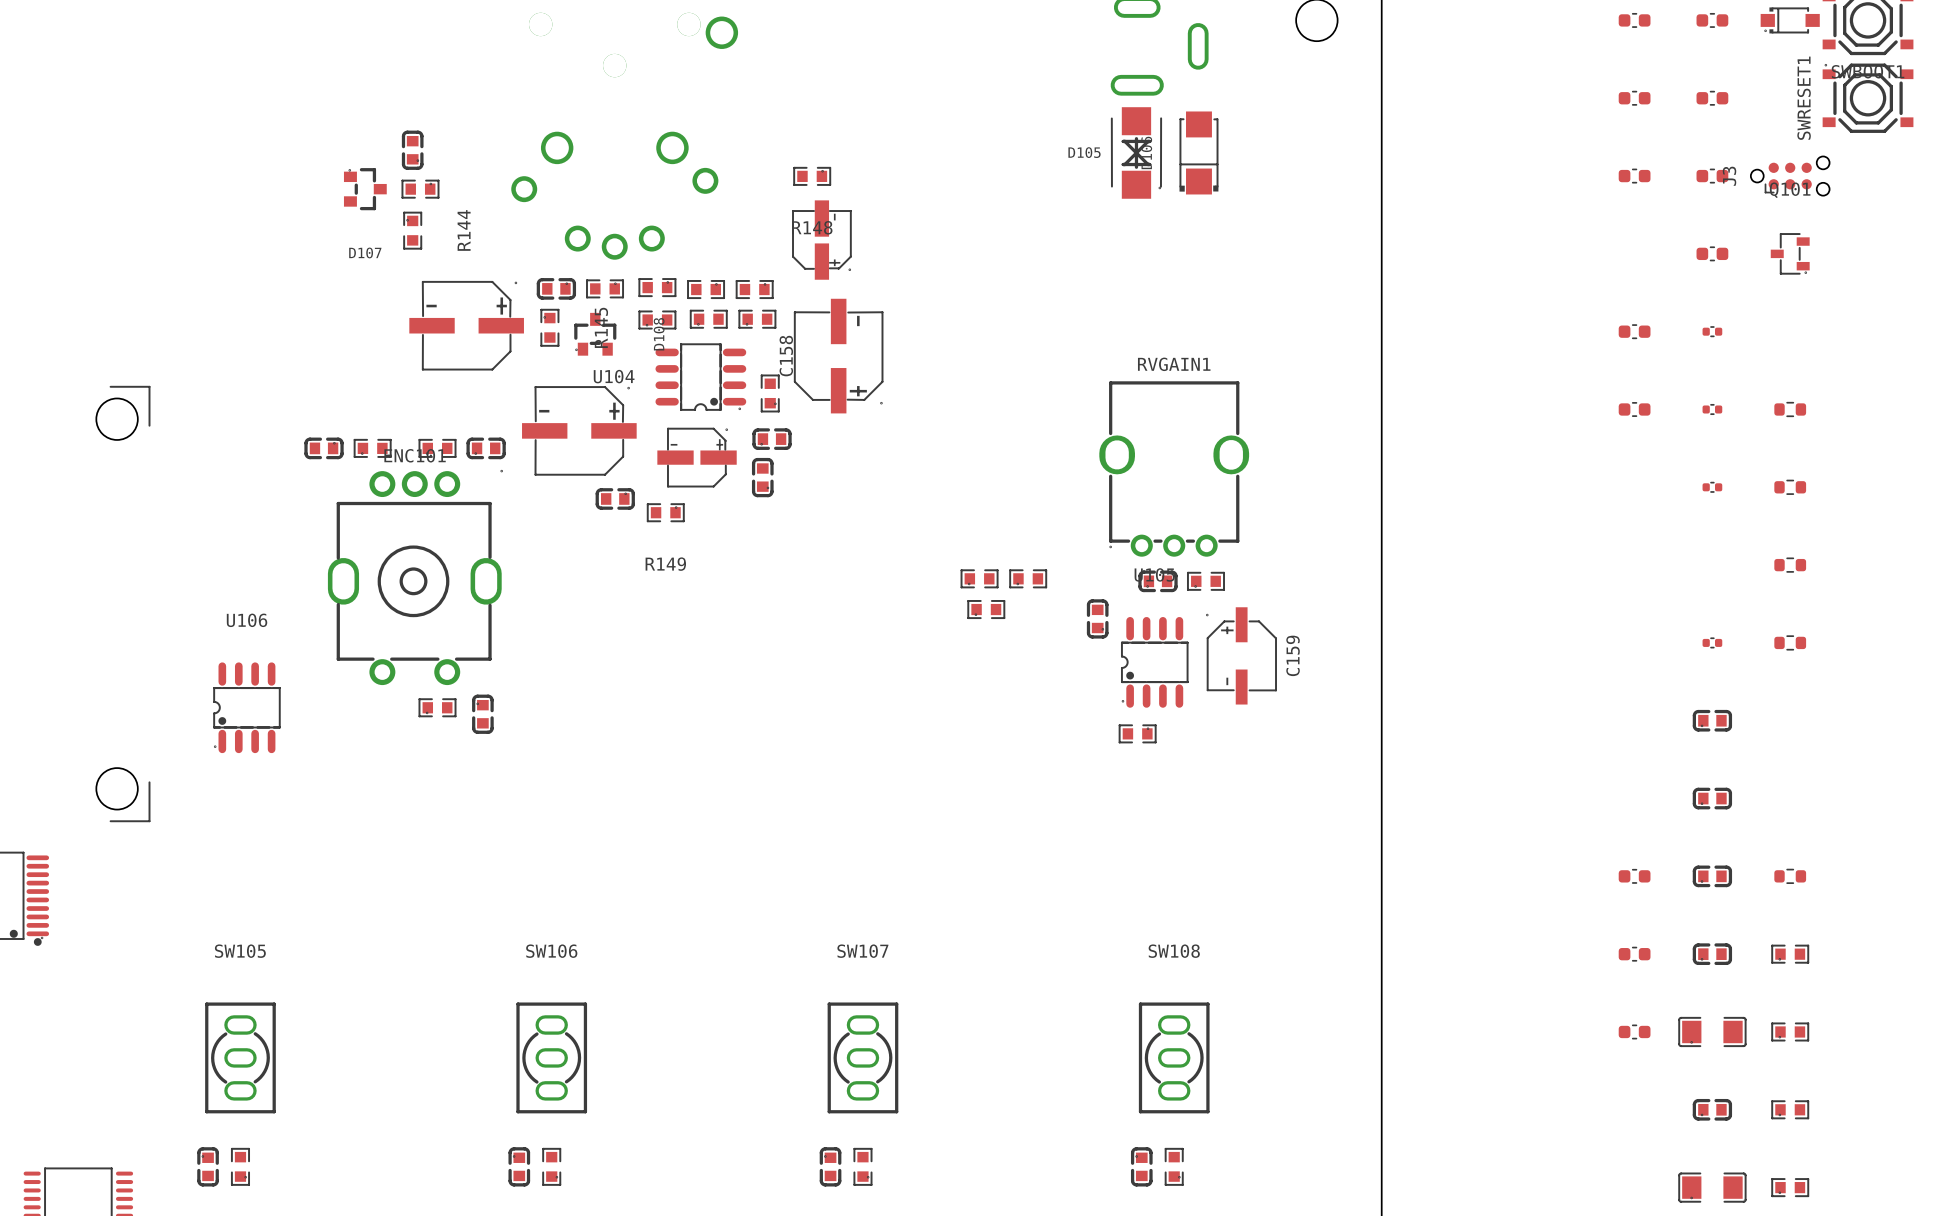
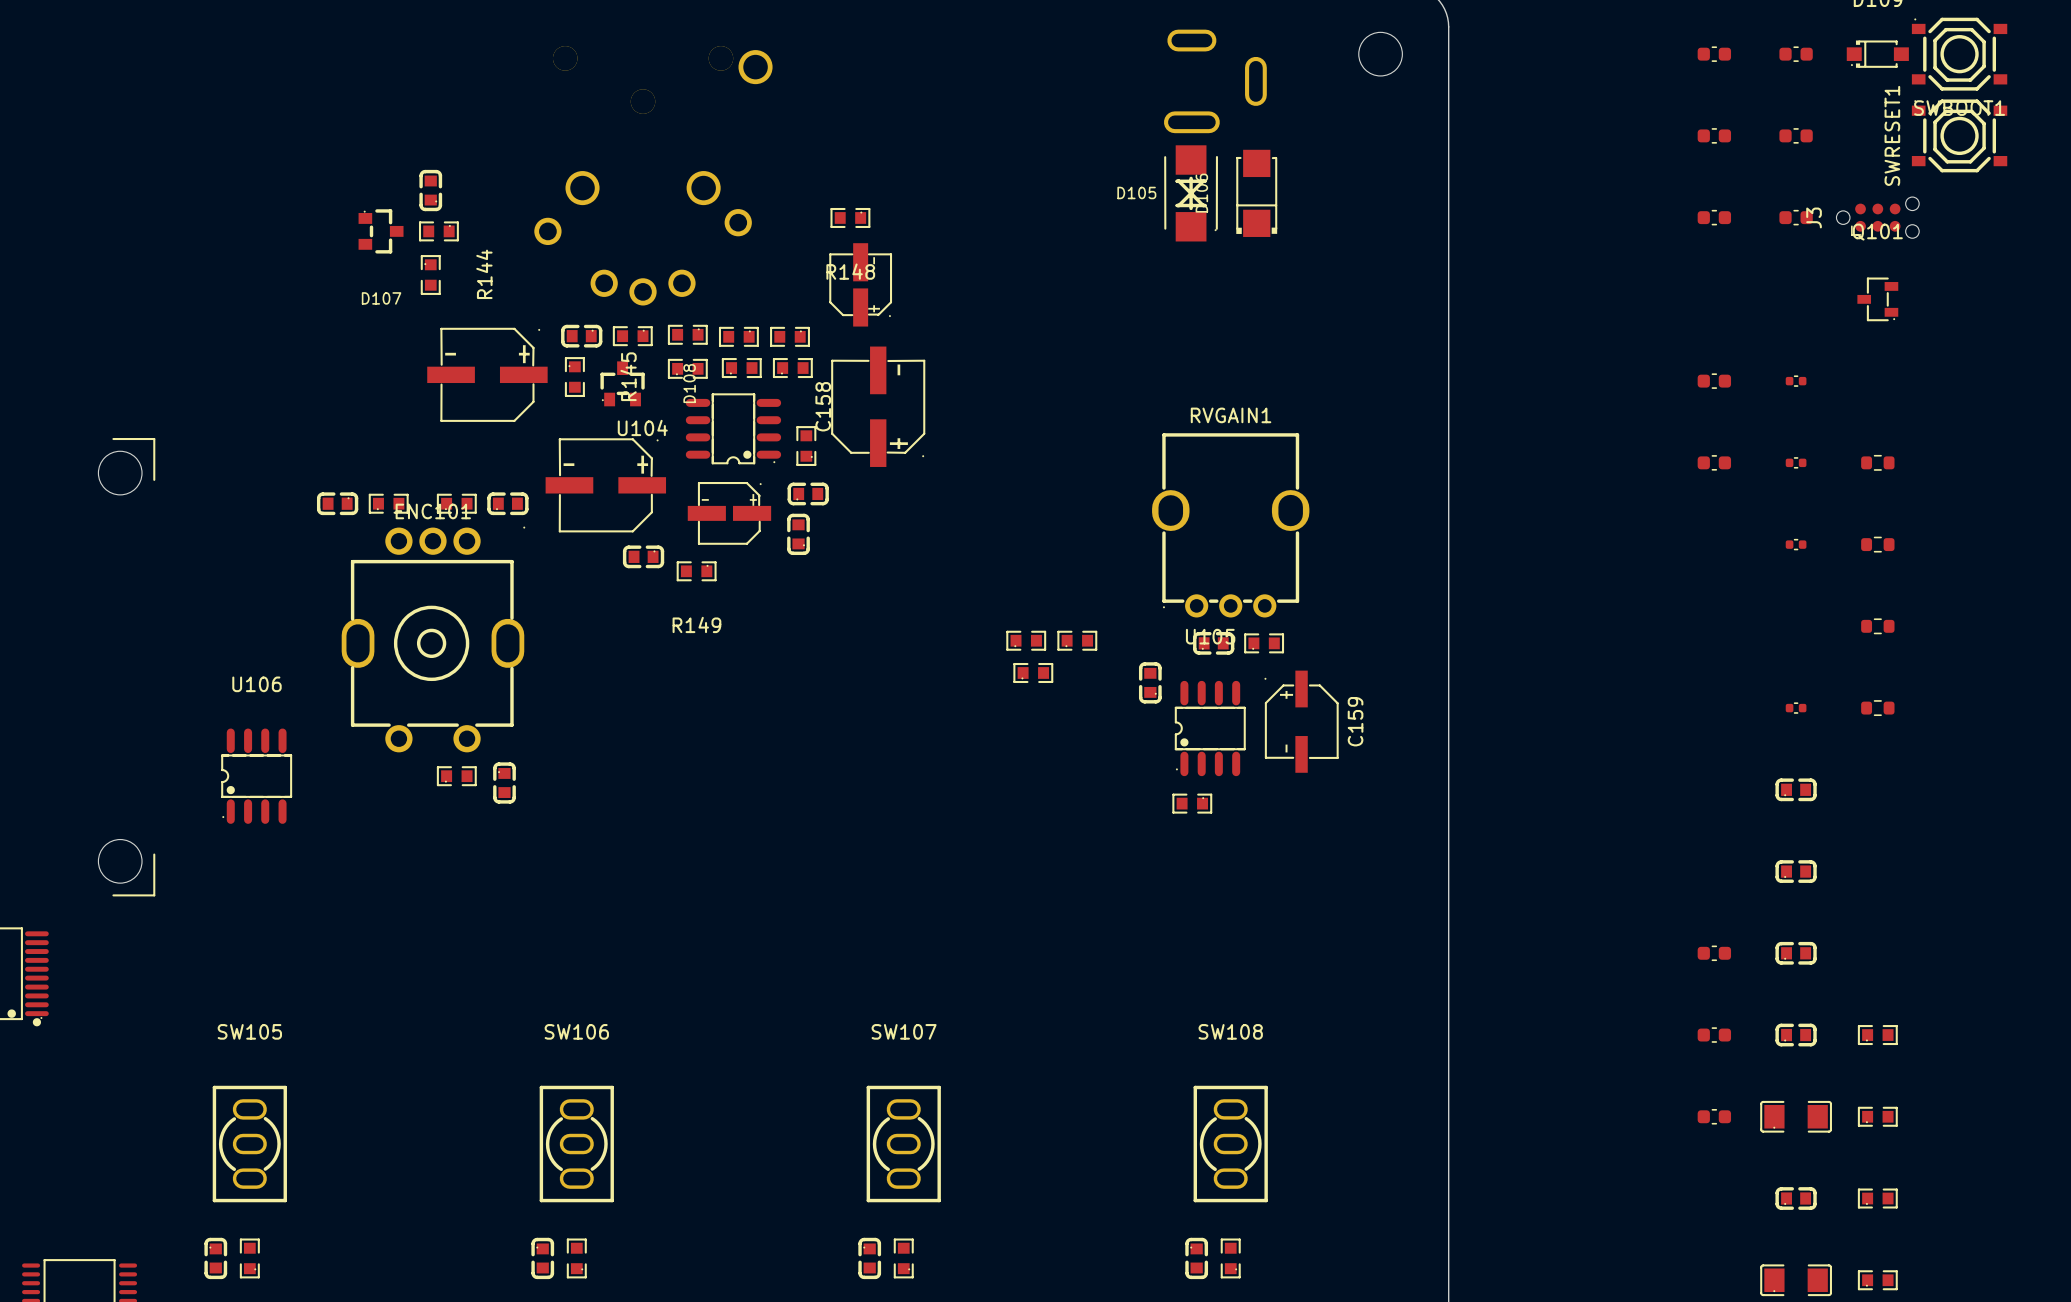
part: (1712, 253) -> none
part: (1790, 876) -> none

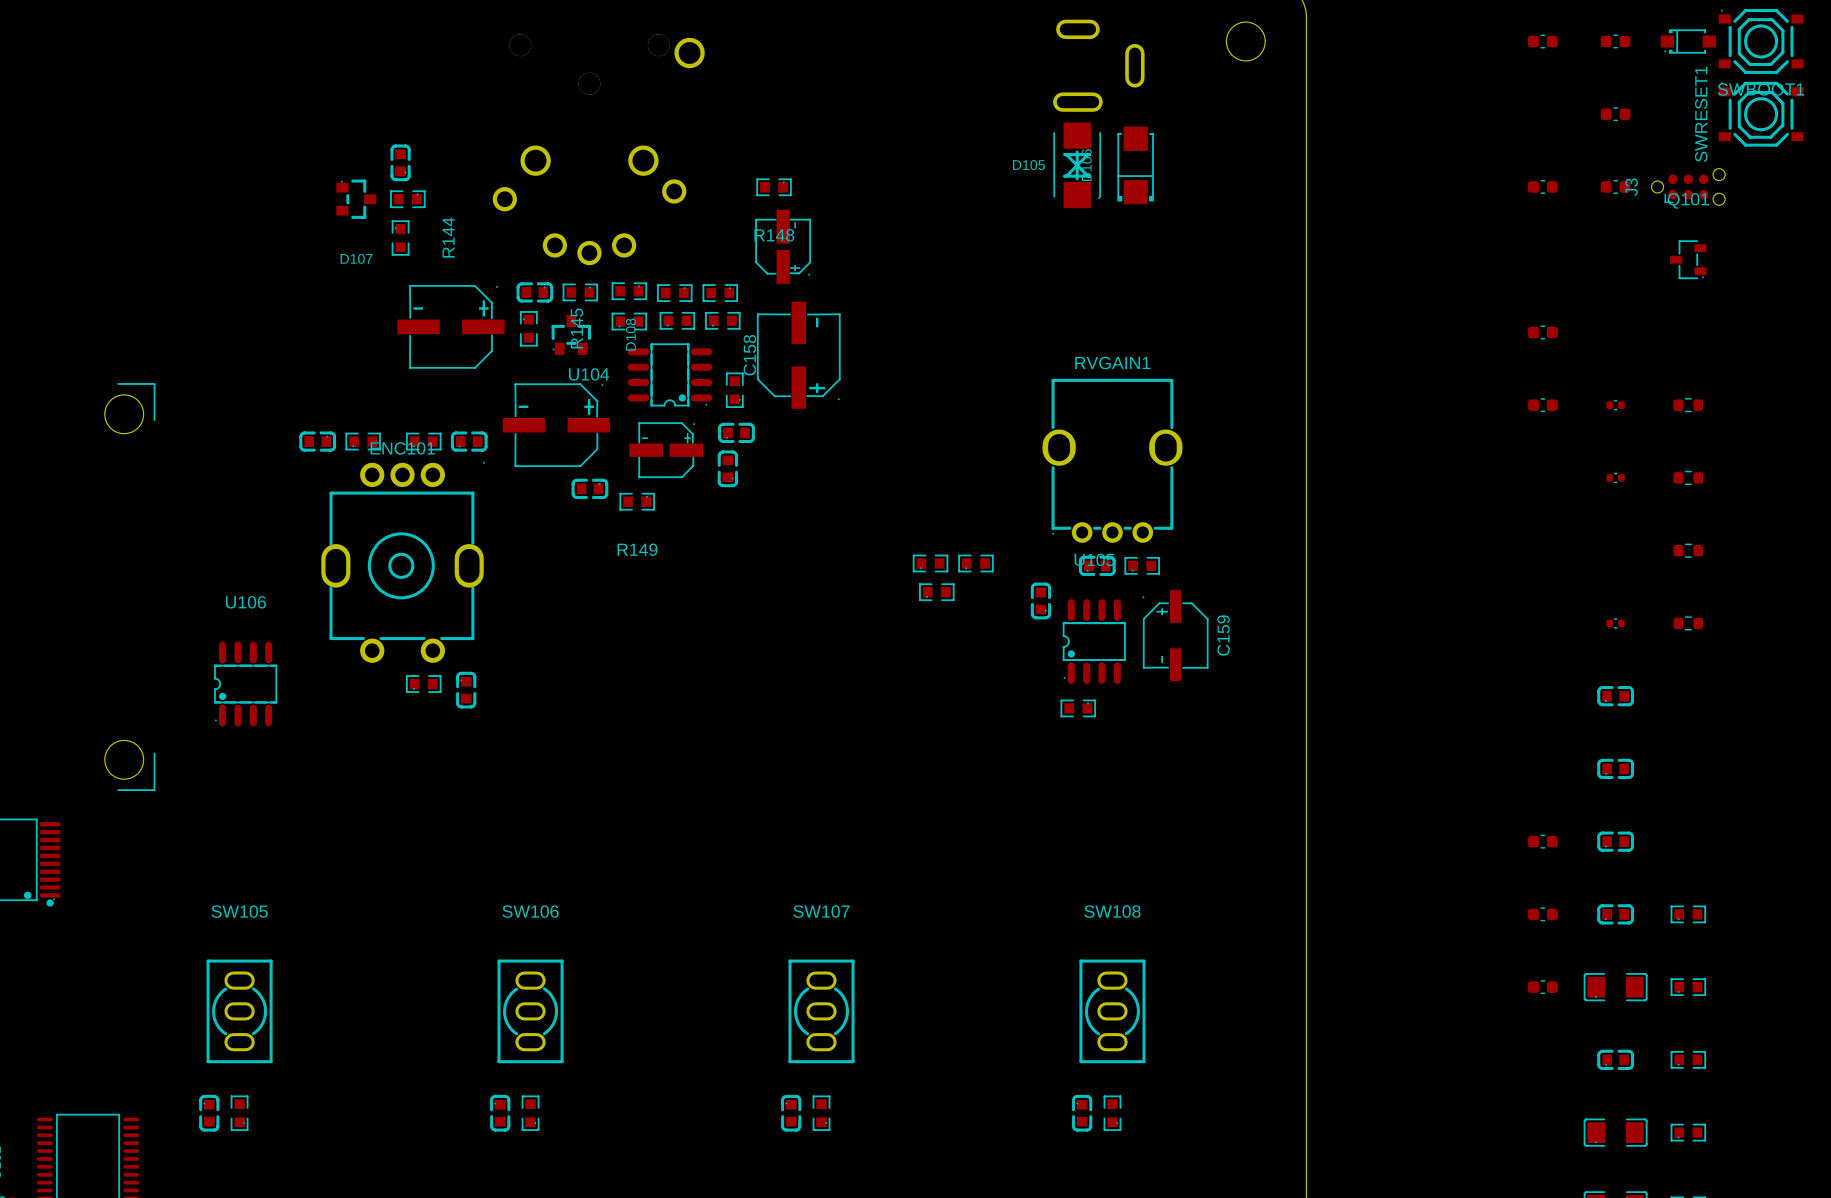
part: (1714, 135) -> none
part: (1796, 381) -> none

